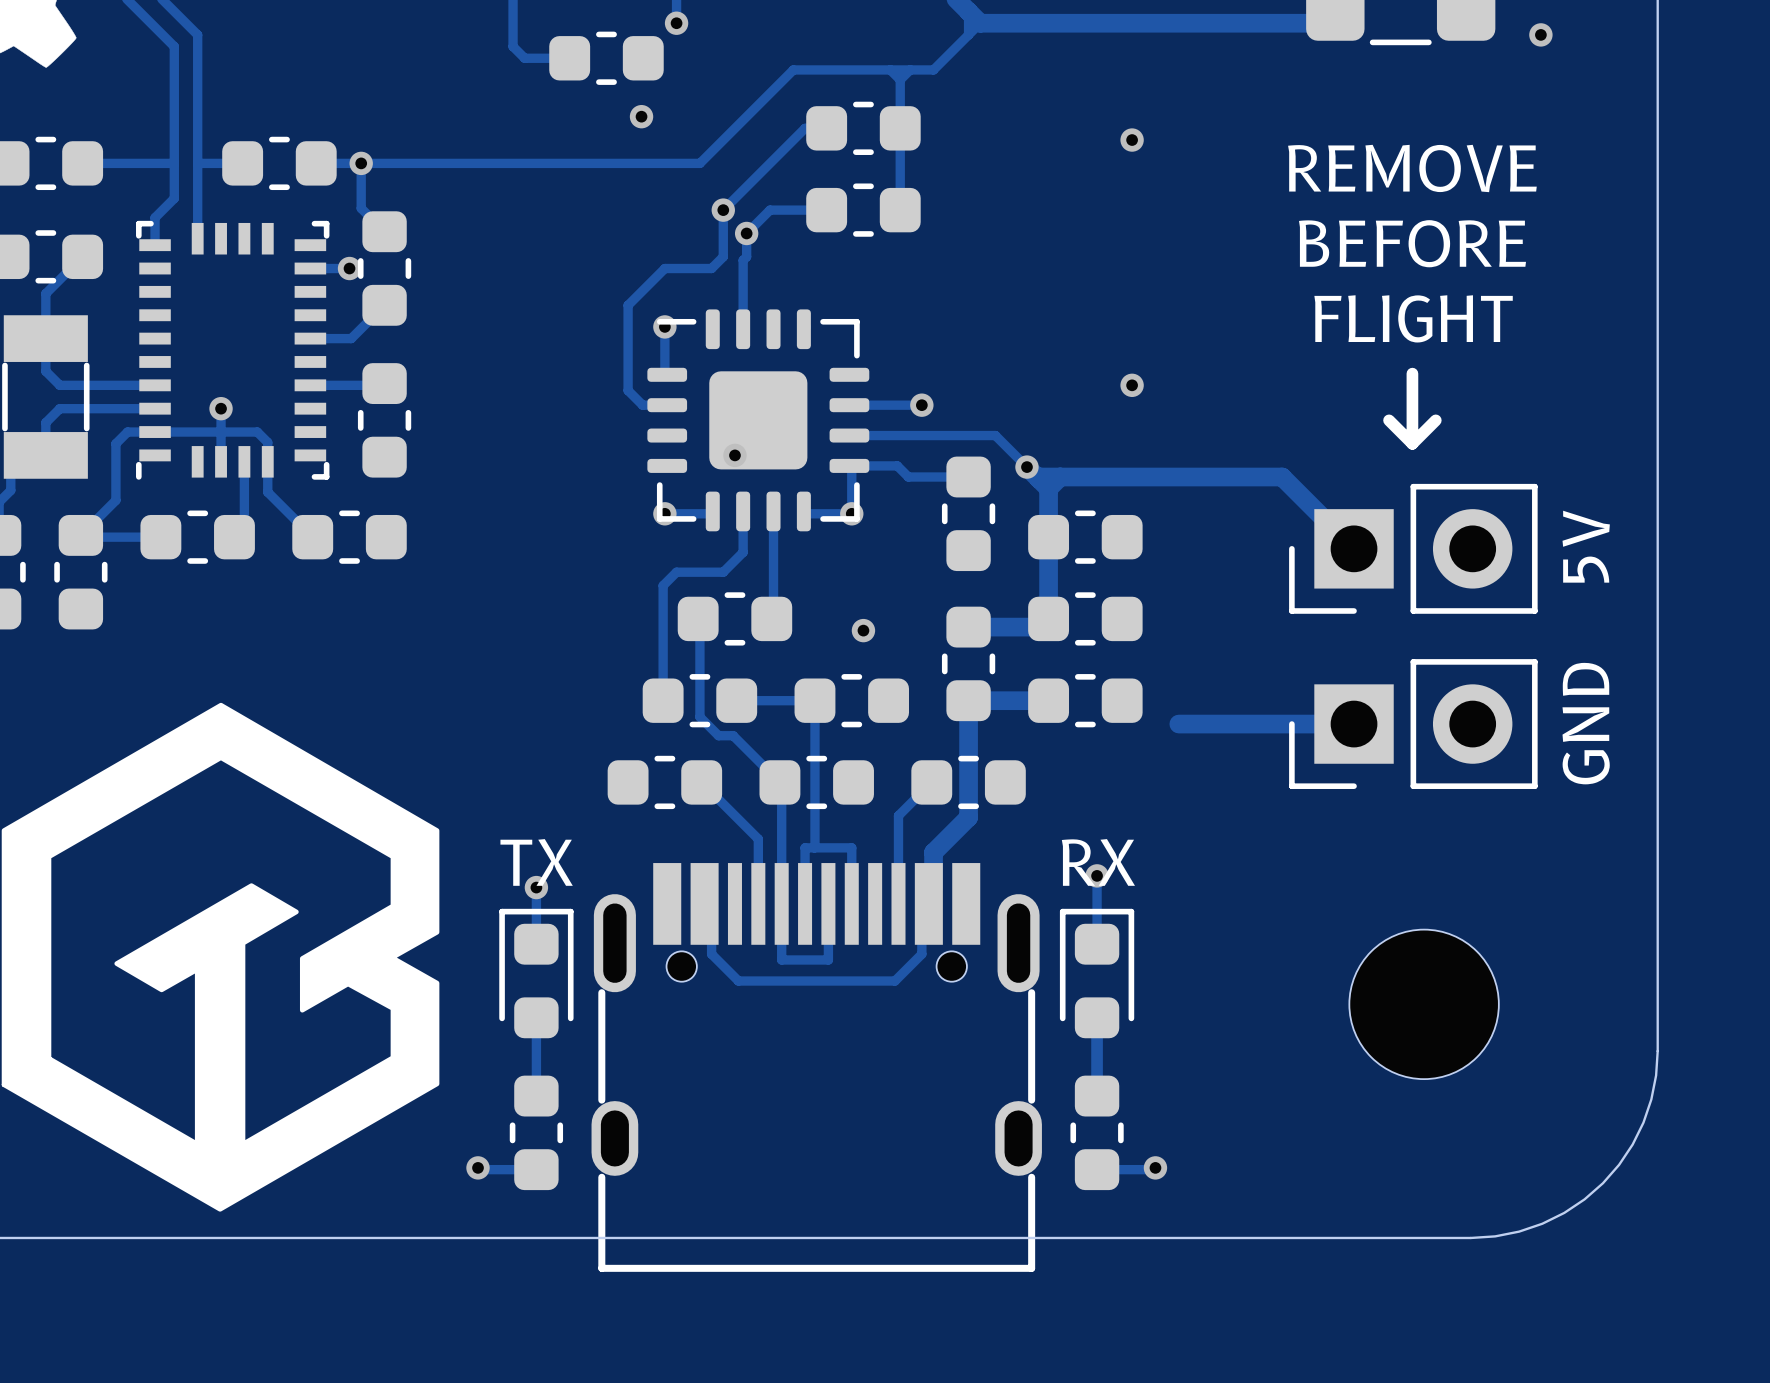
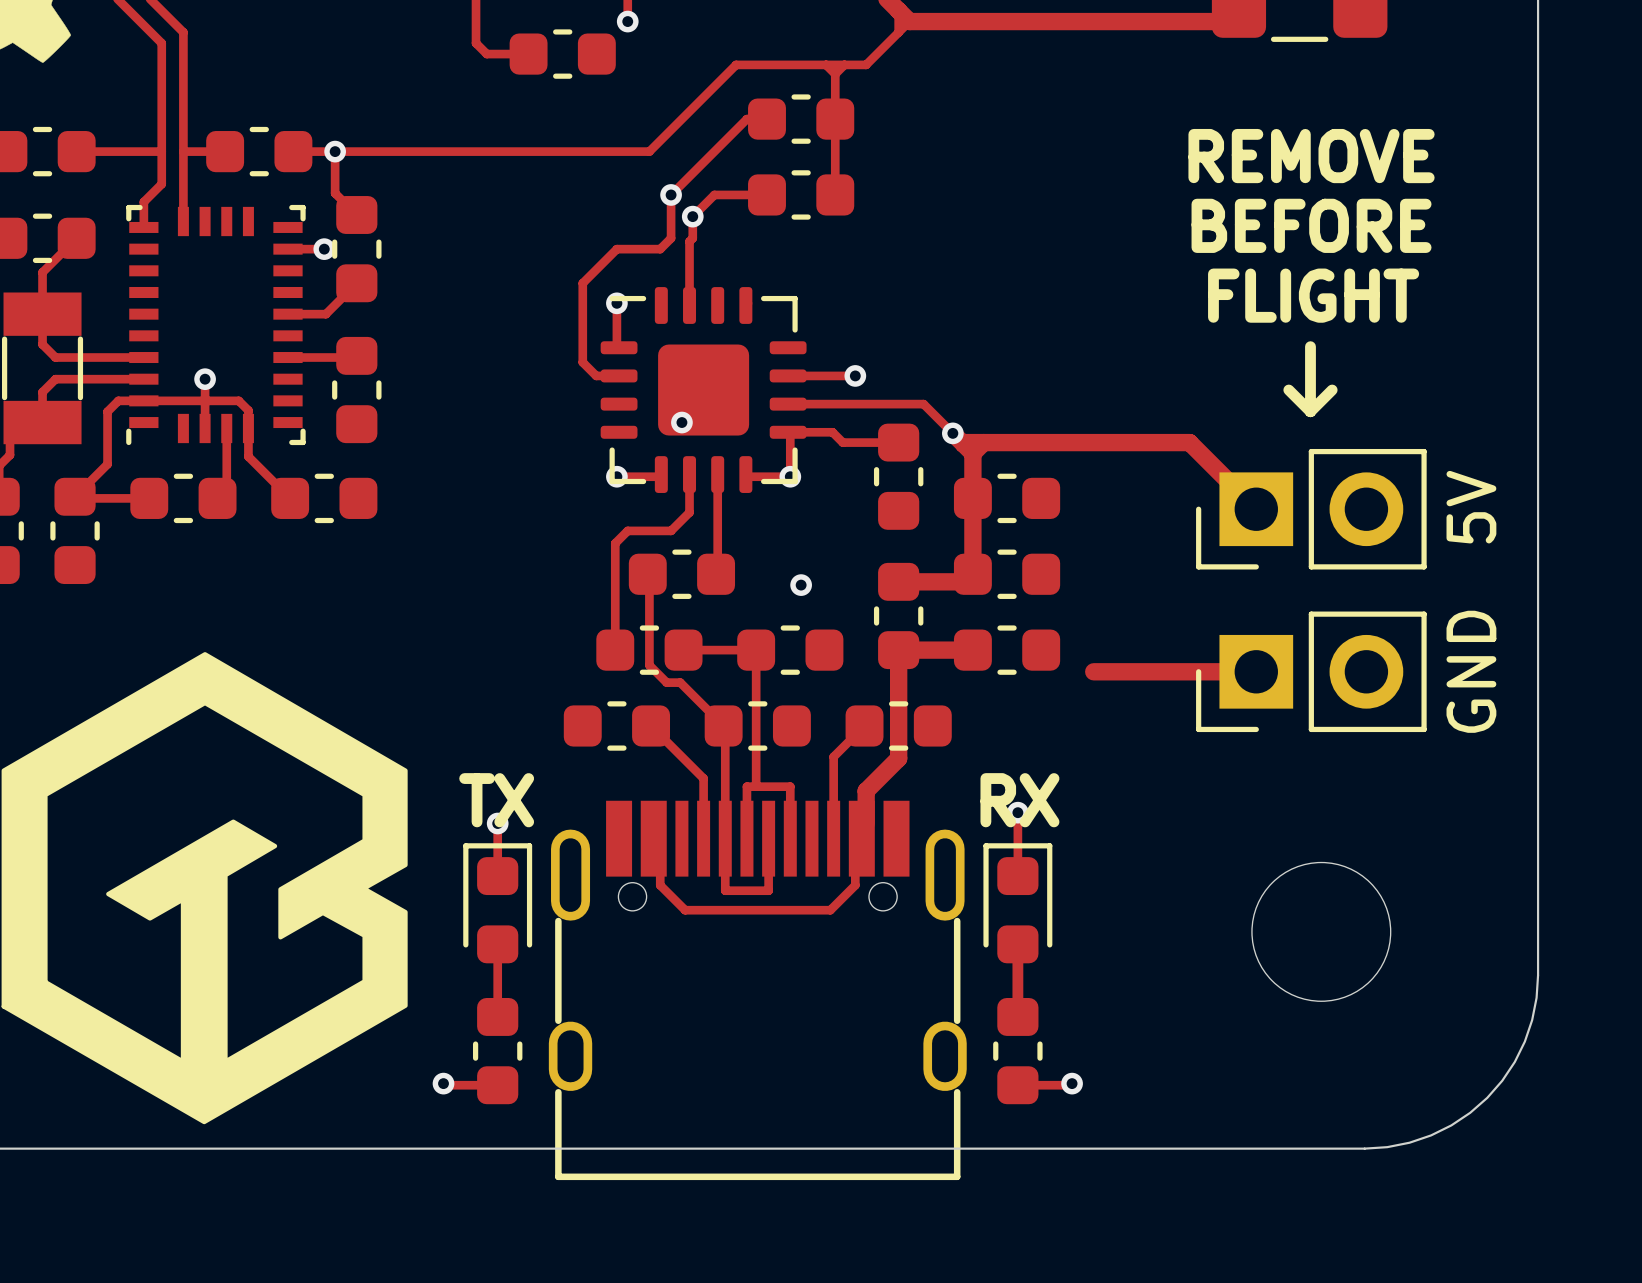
via: (1540, 34) -> none
via: (641, 116) -> none
via: (1132, 140) -> none
via: (1132, 385) -> none

